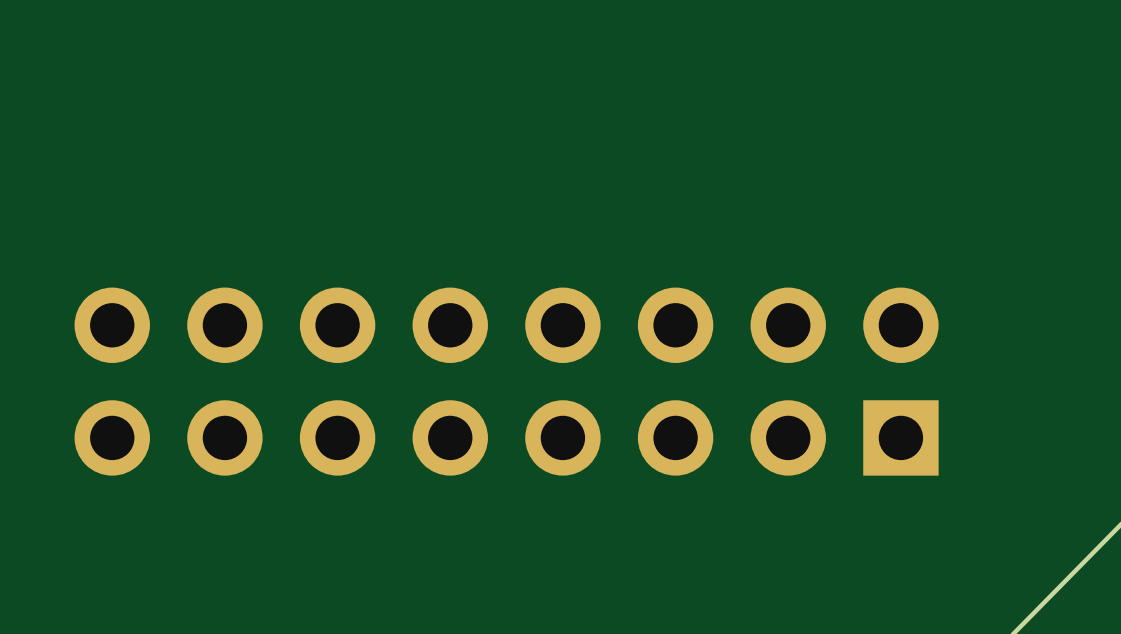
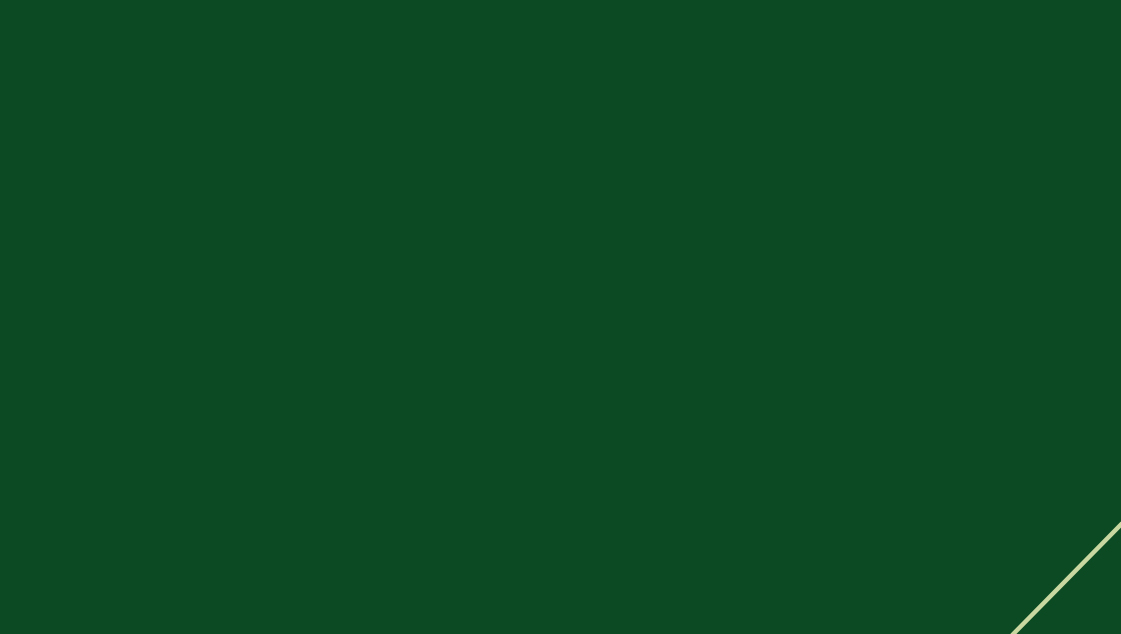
part: (506, 381) -> none

